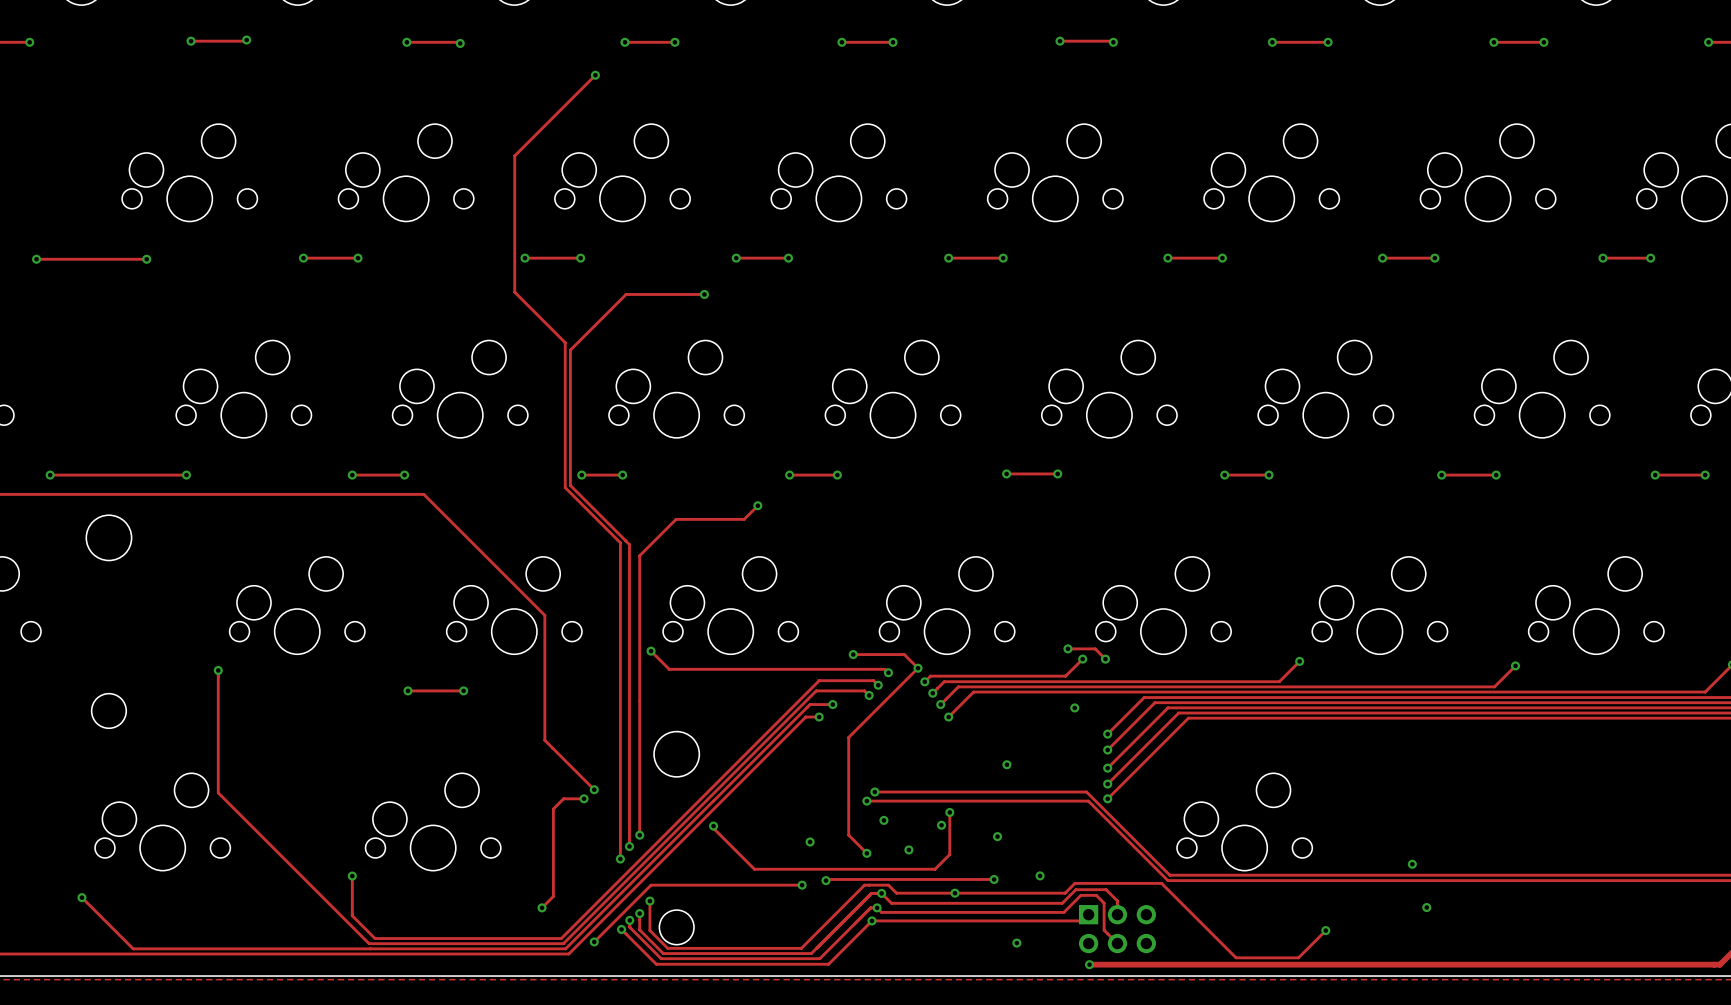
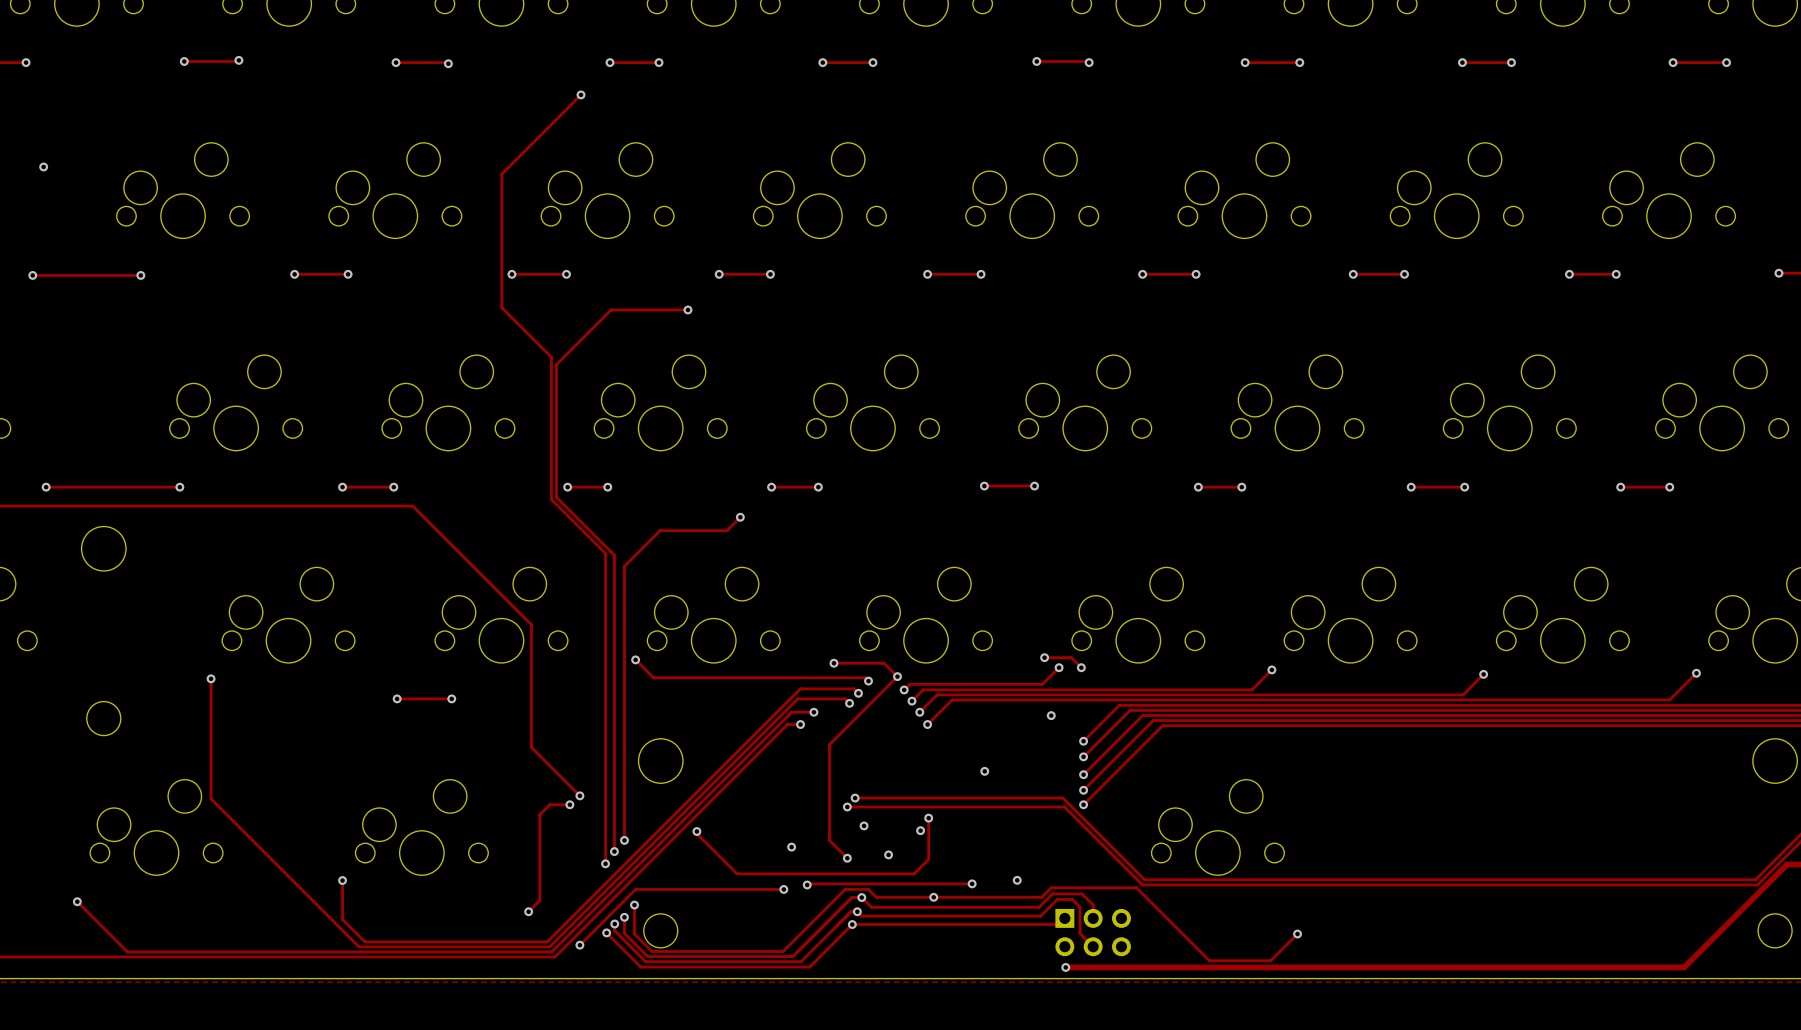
via: none -> (43, 166)
via: (997, 836) -> none
via: (1412, 864) -> none
via: (1426, 907) -> none
via: (1016, 943) -> none

